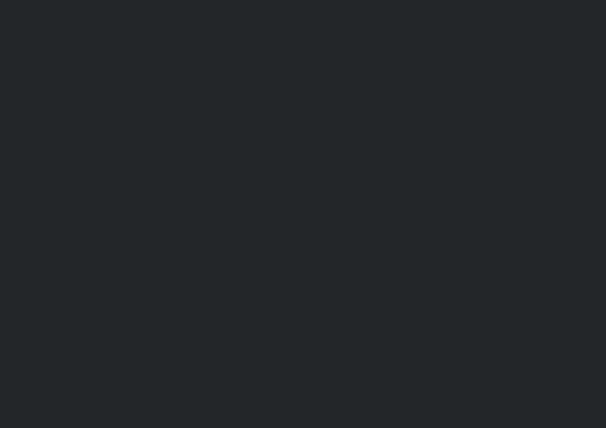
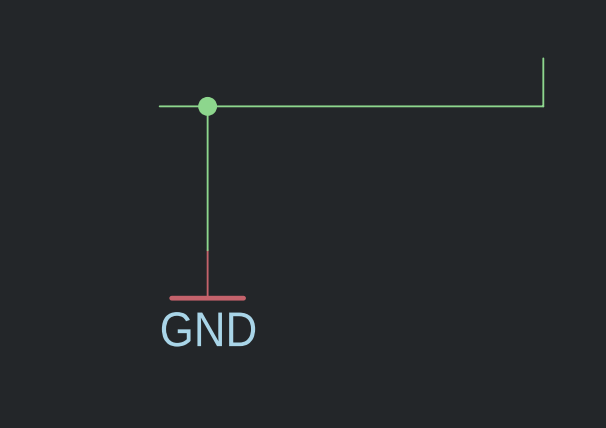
wire: none -> (543, 58) (543, 106) (159, 106)
wire: none -> (207, 106) (207, 250)
junction: none -> (207, 106)
power symbol: none -> GND (207, 275)

